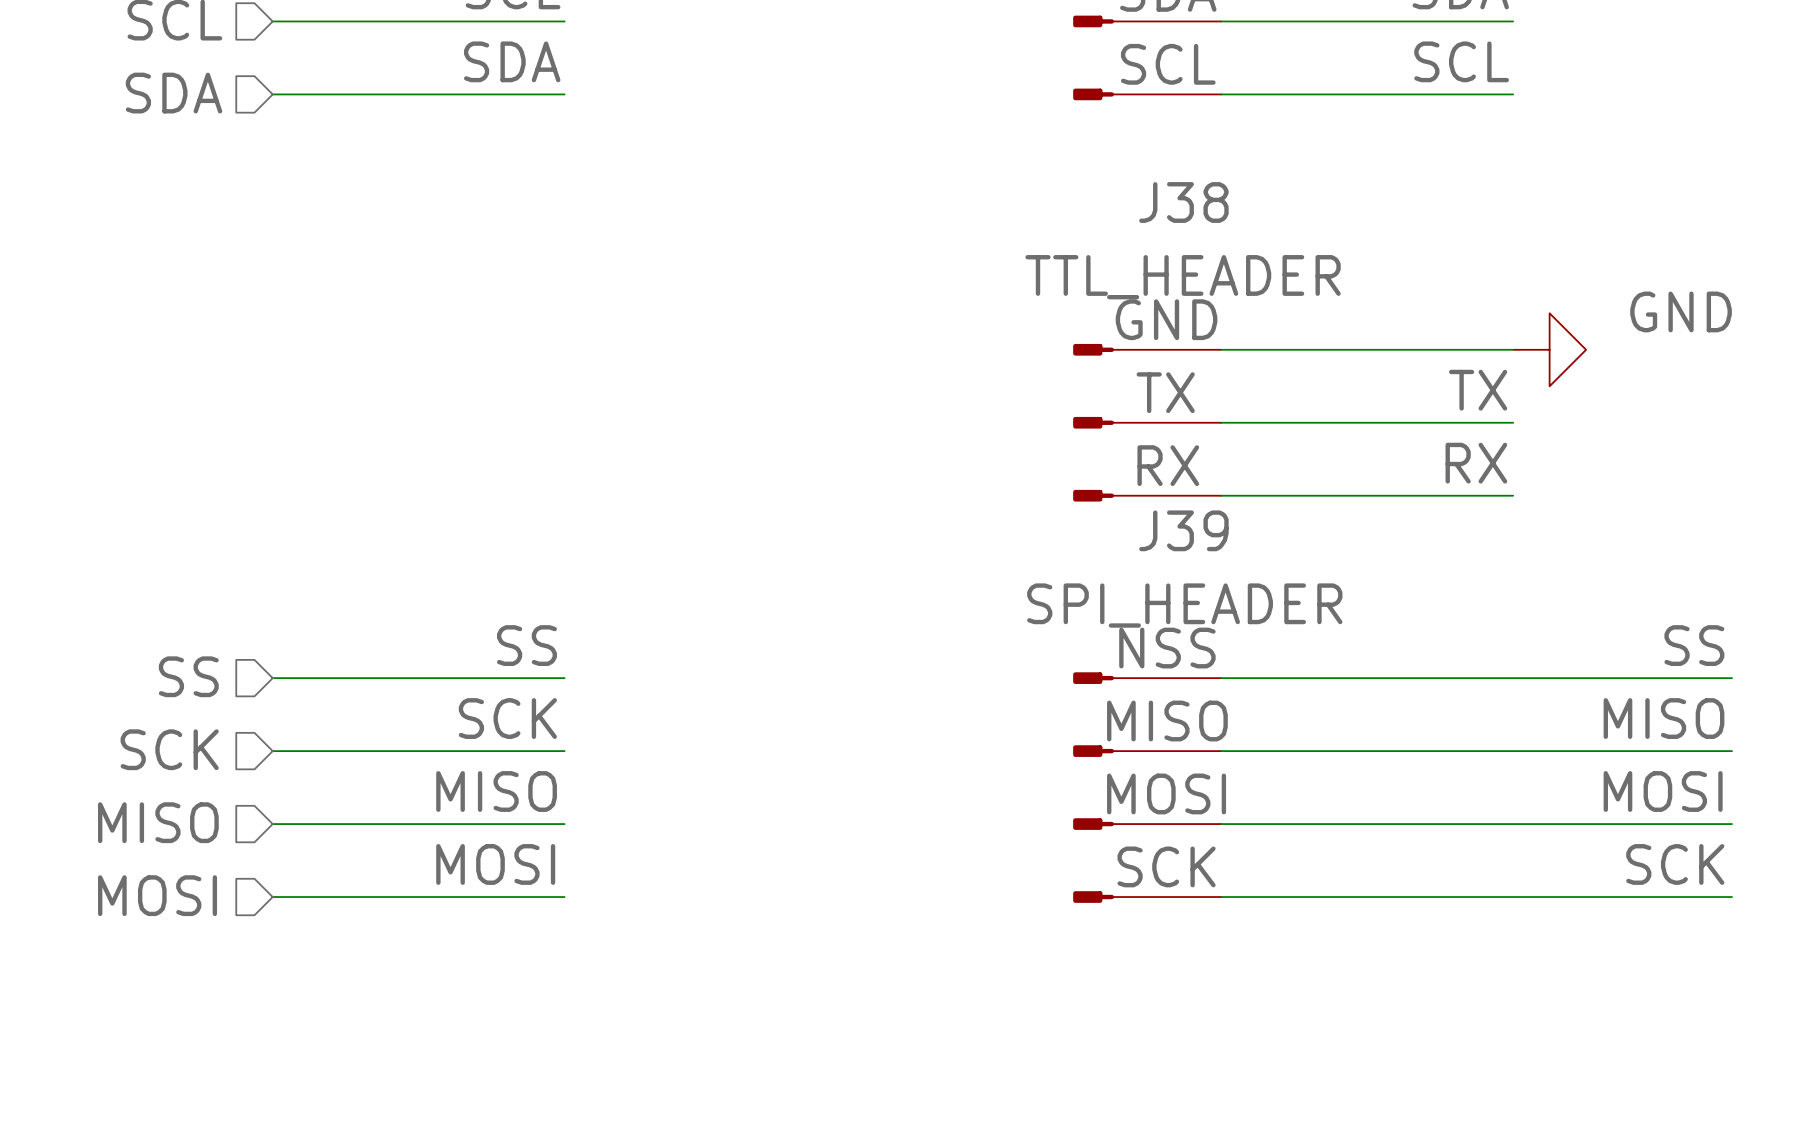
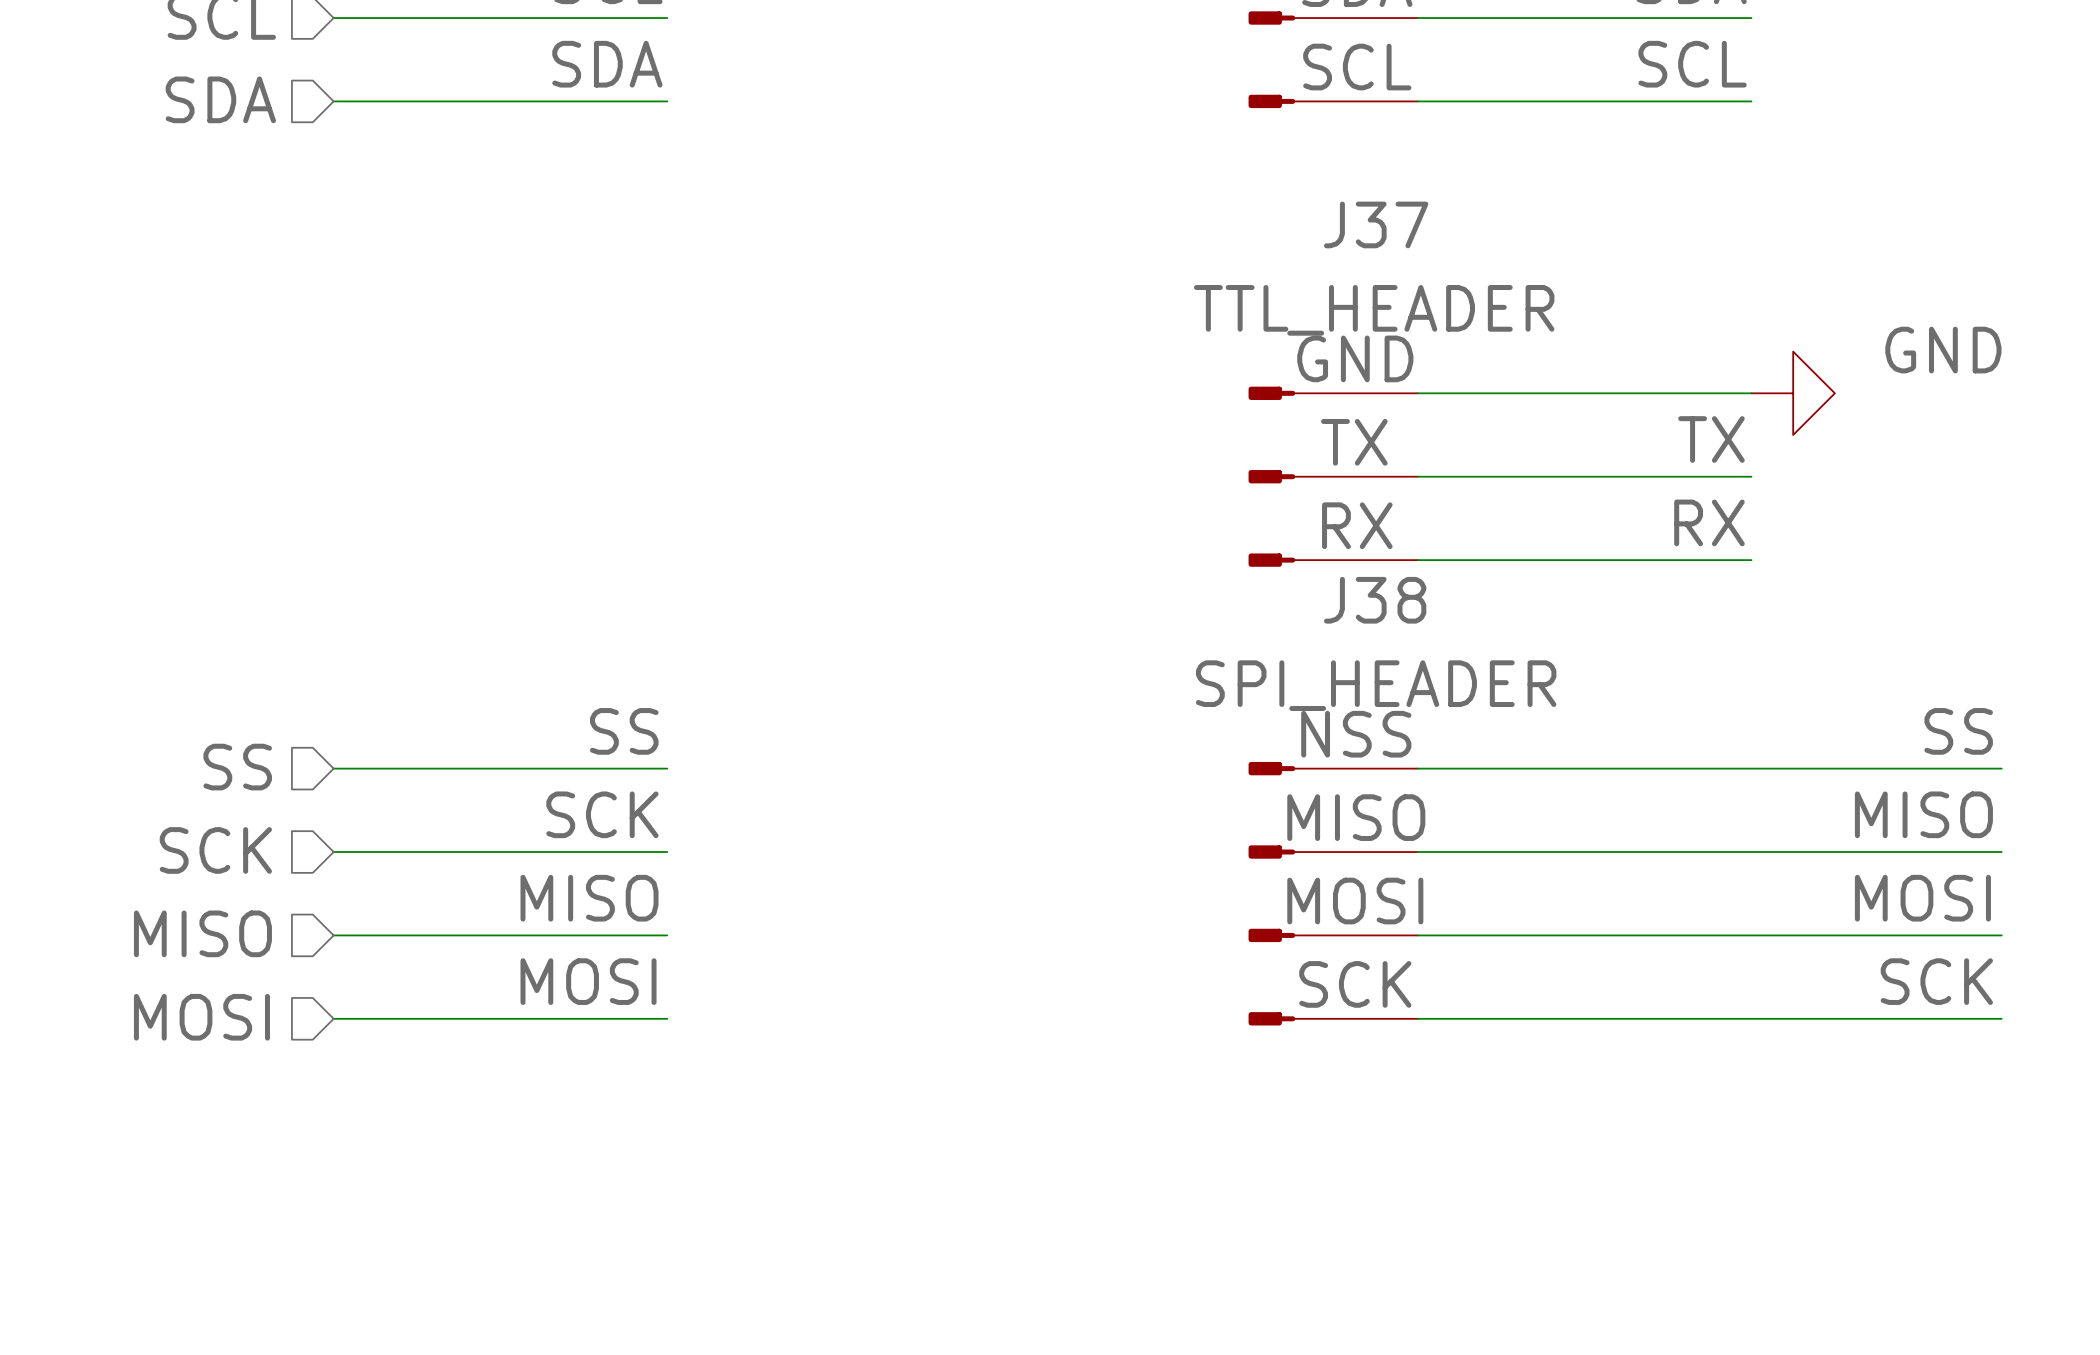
J38 name: J38 (1183, 202) -> J37 (1376, 224)
J39 name: J39 (1183, 530) -> J38 (1375, 600)

